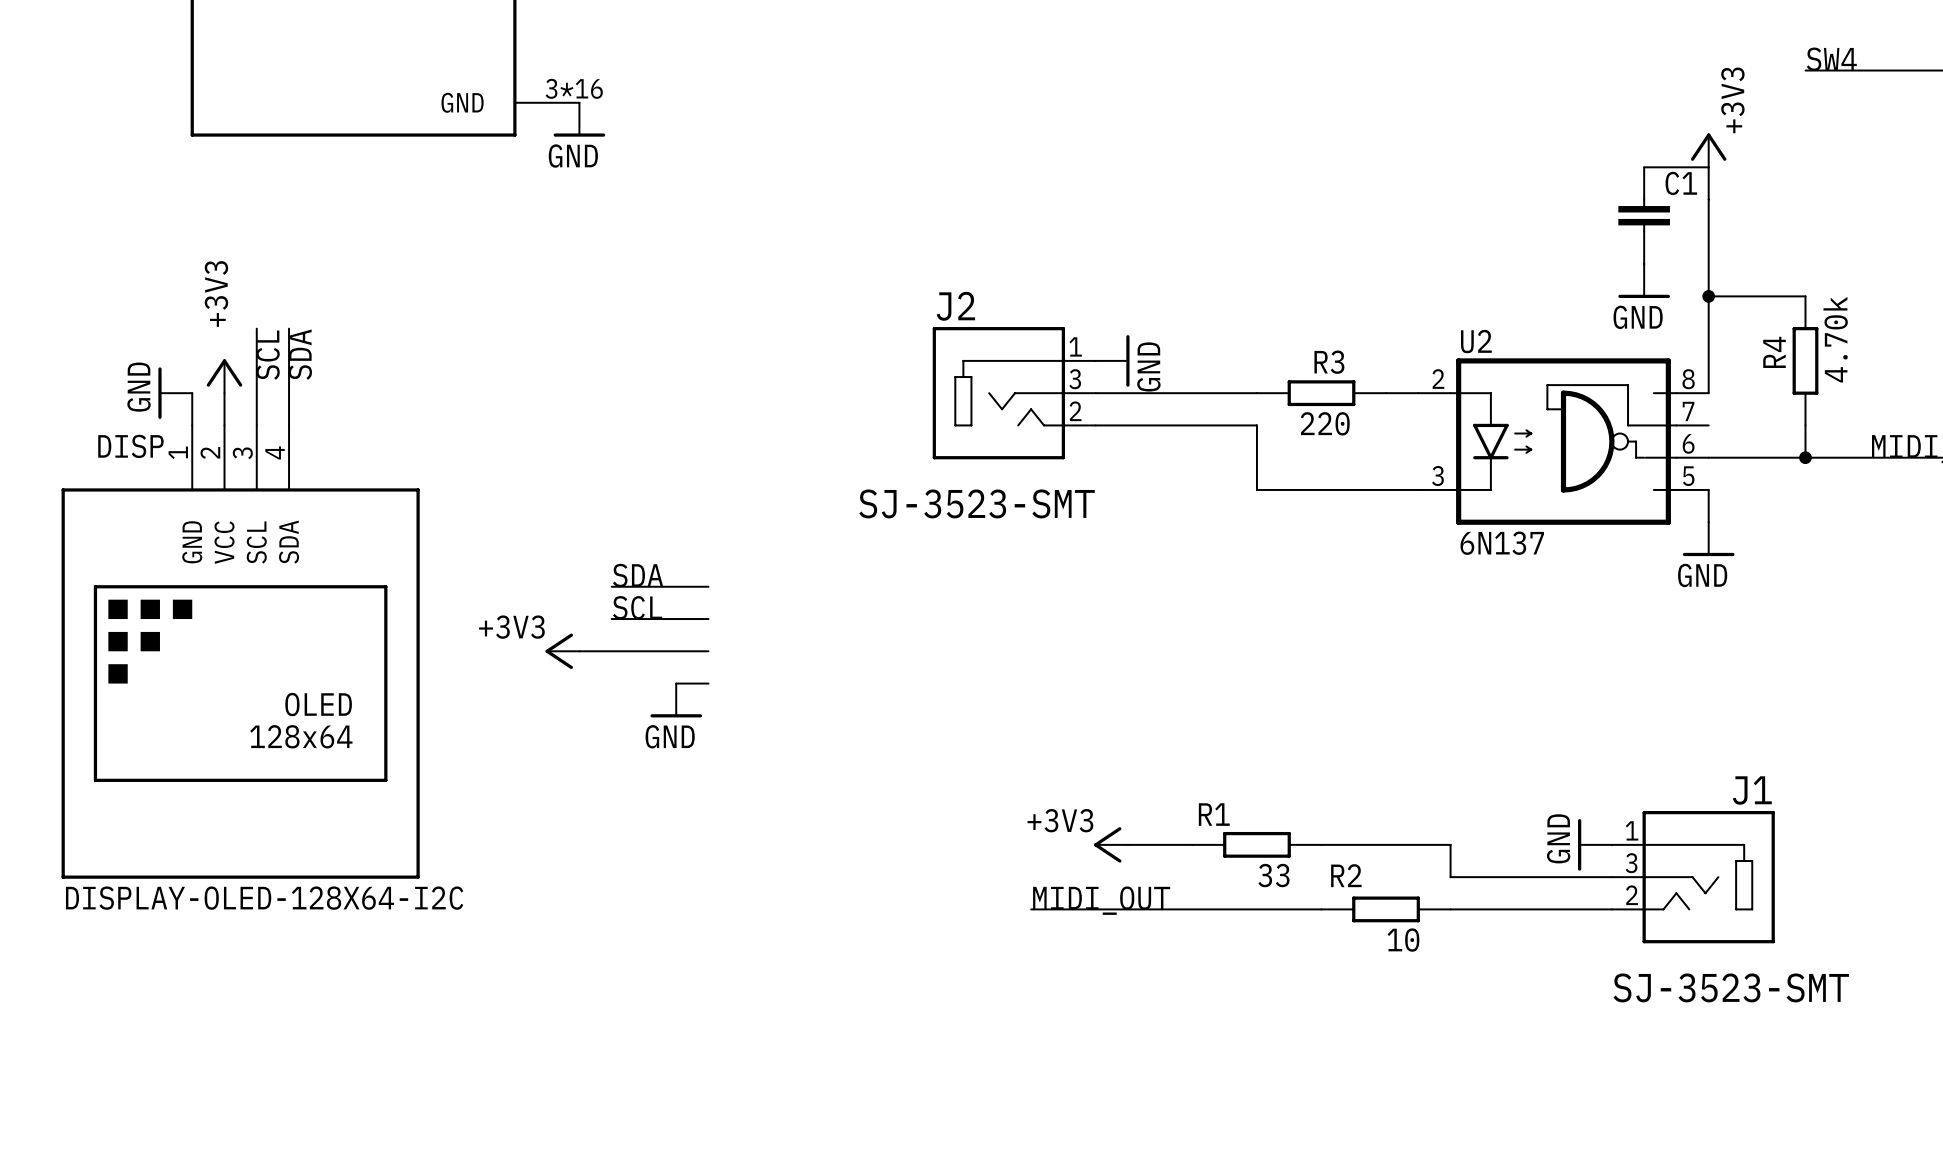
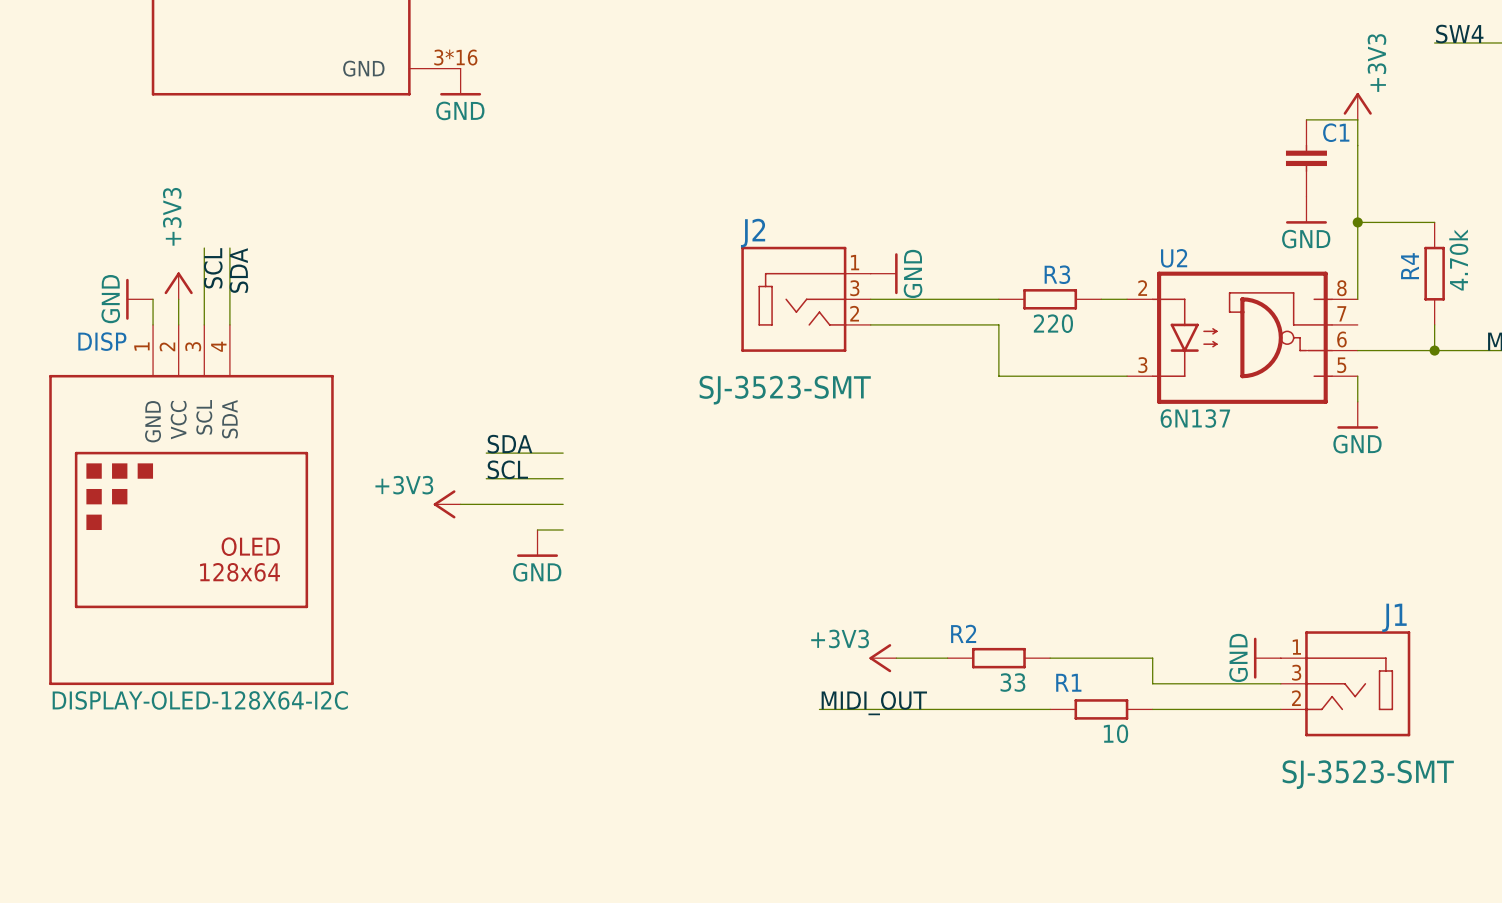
R1 name: R1 (1214, 814) -> R2 (963, 633)
R2 name: R2 (1346, 875) -> R1 (1068, 682)

